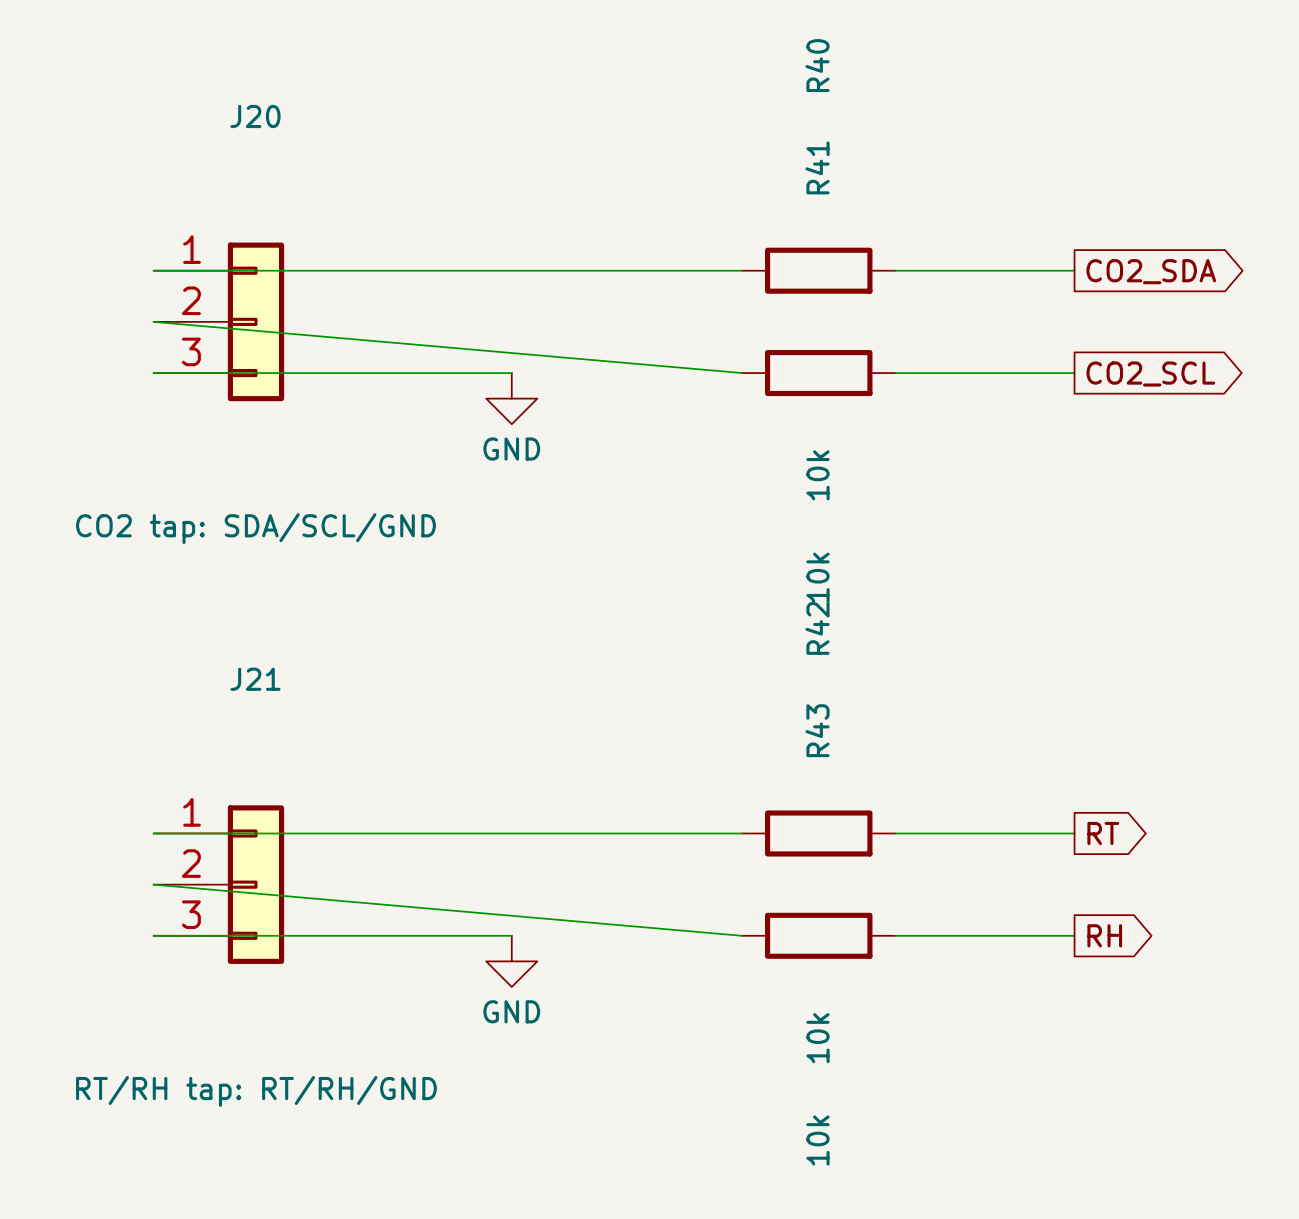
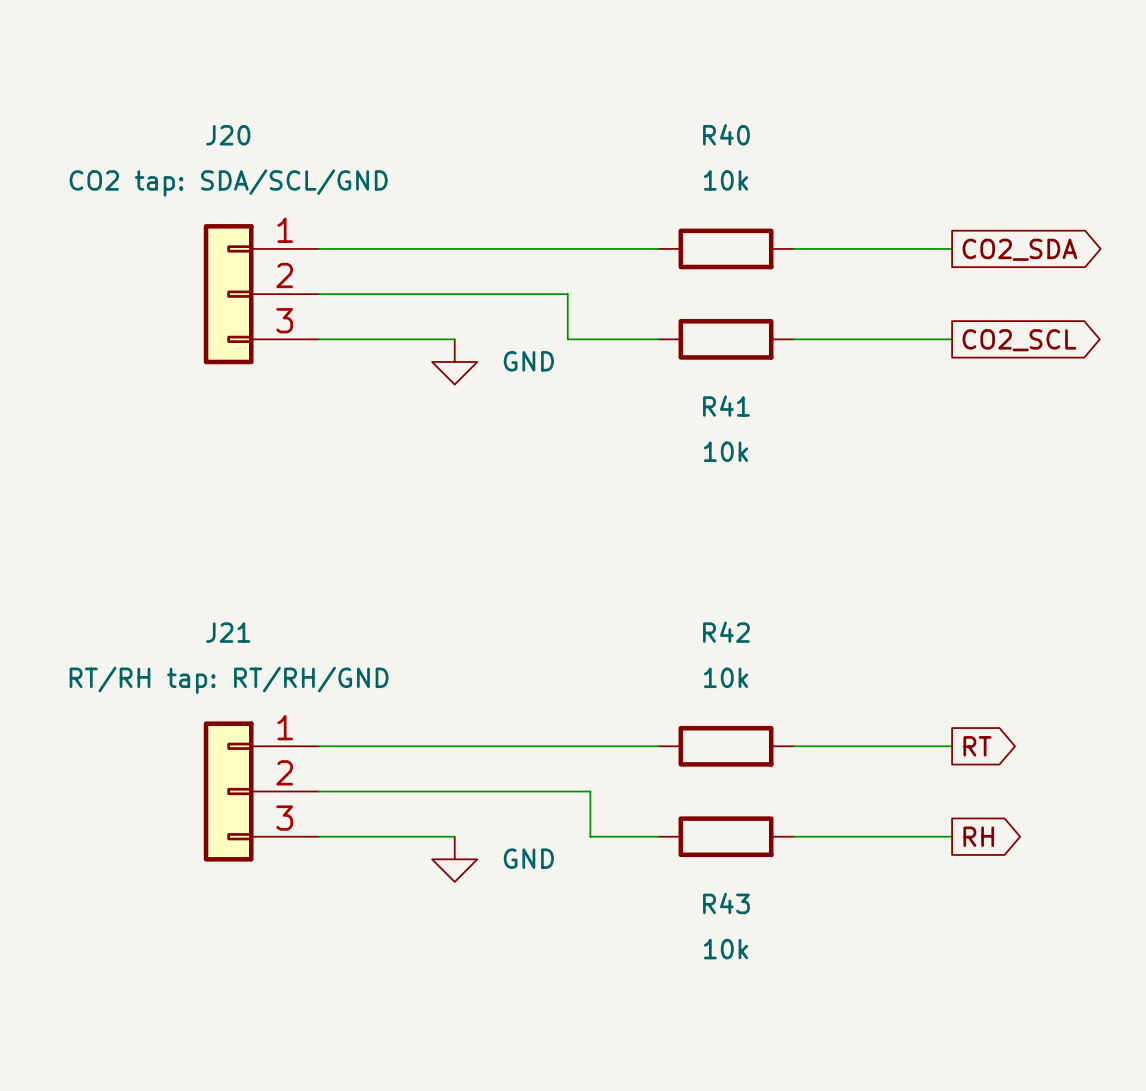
R40 name rotation: 0° (817, 65) -> 90° clockwise (726, 134)
R40 name position: R40 (817, 65) -> R40 (726, 134)
R41 name rotation: 0° (817, 167) -> 90° clockwise (726, 406)
R41 name position: R41 (817, 167) -> R41 (726, 406)
wire: (153, 321) (742, 373) -> (319, 294) (567, 294) (567, 339) (658, 339)
J20 flip: as is (255, 321) -> left-right (228, 294)
power symbol text position: GND (511, 449) -> GND (528, 361)
R40 value rotation: 0° (817, 475) -> 90° clockwise (726, 180)
R40 value position: 10k (817, 475) -> 10k (726, 180)
J20 value position: CO2 tap: SDA/SCL/GND (255, 528) -> CO2 tap: SDA/SCL/GND (228, 182)
R41 value rotation: 0° (817, 577) -> 90° clockwise (726, 451)
R41 value position: 10k (817, 577) -> 10k (726, 451)
R42 name rotation: 0° (817, 628) -> 90° clockwise (726, 632)
R42 name position: R42 (817, 628) -> R42 (726, 632)
R43 name rotation: 0° (817, 730) -> 90° clockwise (726, 903)
R43 name position: R43 (817, 730) -> R43 (726, 903)
wire: (153, 884) (742, 935) -> (319, 791) (590, 791) (590, 836) (658, 836)
J21 flip: as is (255, 884) -> left-right (228, 791)
power symbol text position: GND (511, 1011) -> GND (528, 858)
R42 value rotation: 0° (817, 1038) -> 90° clockwise (726, 677)
R42 value position: 10k (817, 1038) -> 10k (726, 677)
J21 value position: RT/RH tap: RT/RH/GND (256, 1091) -> RT/RH tap: RT/RH/GND (229, 680)
R43 value rotation: 0° (817, 1140) -> 90° clockwise (726, 949)
R43 value position: 10k (817, 1140) -> 10k (726, 949)

